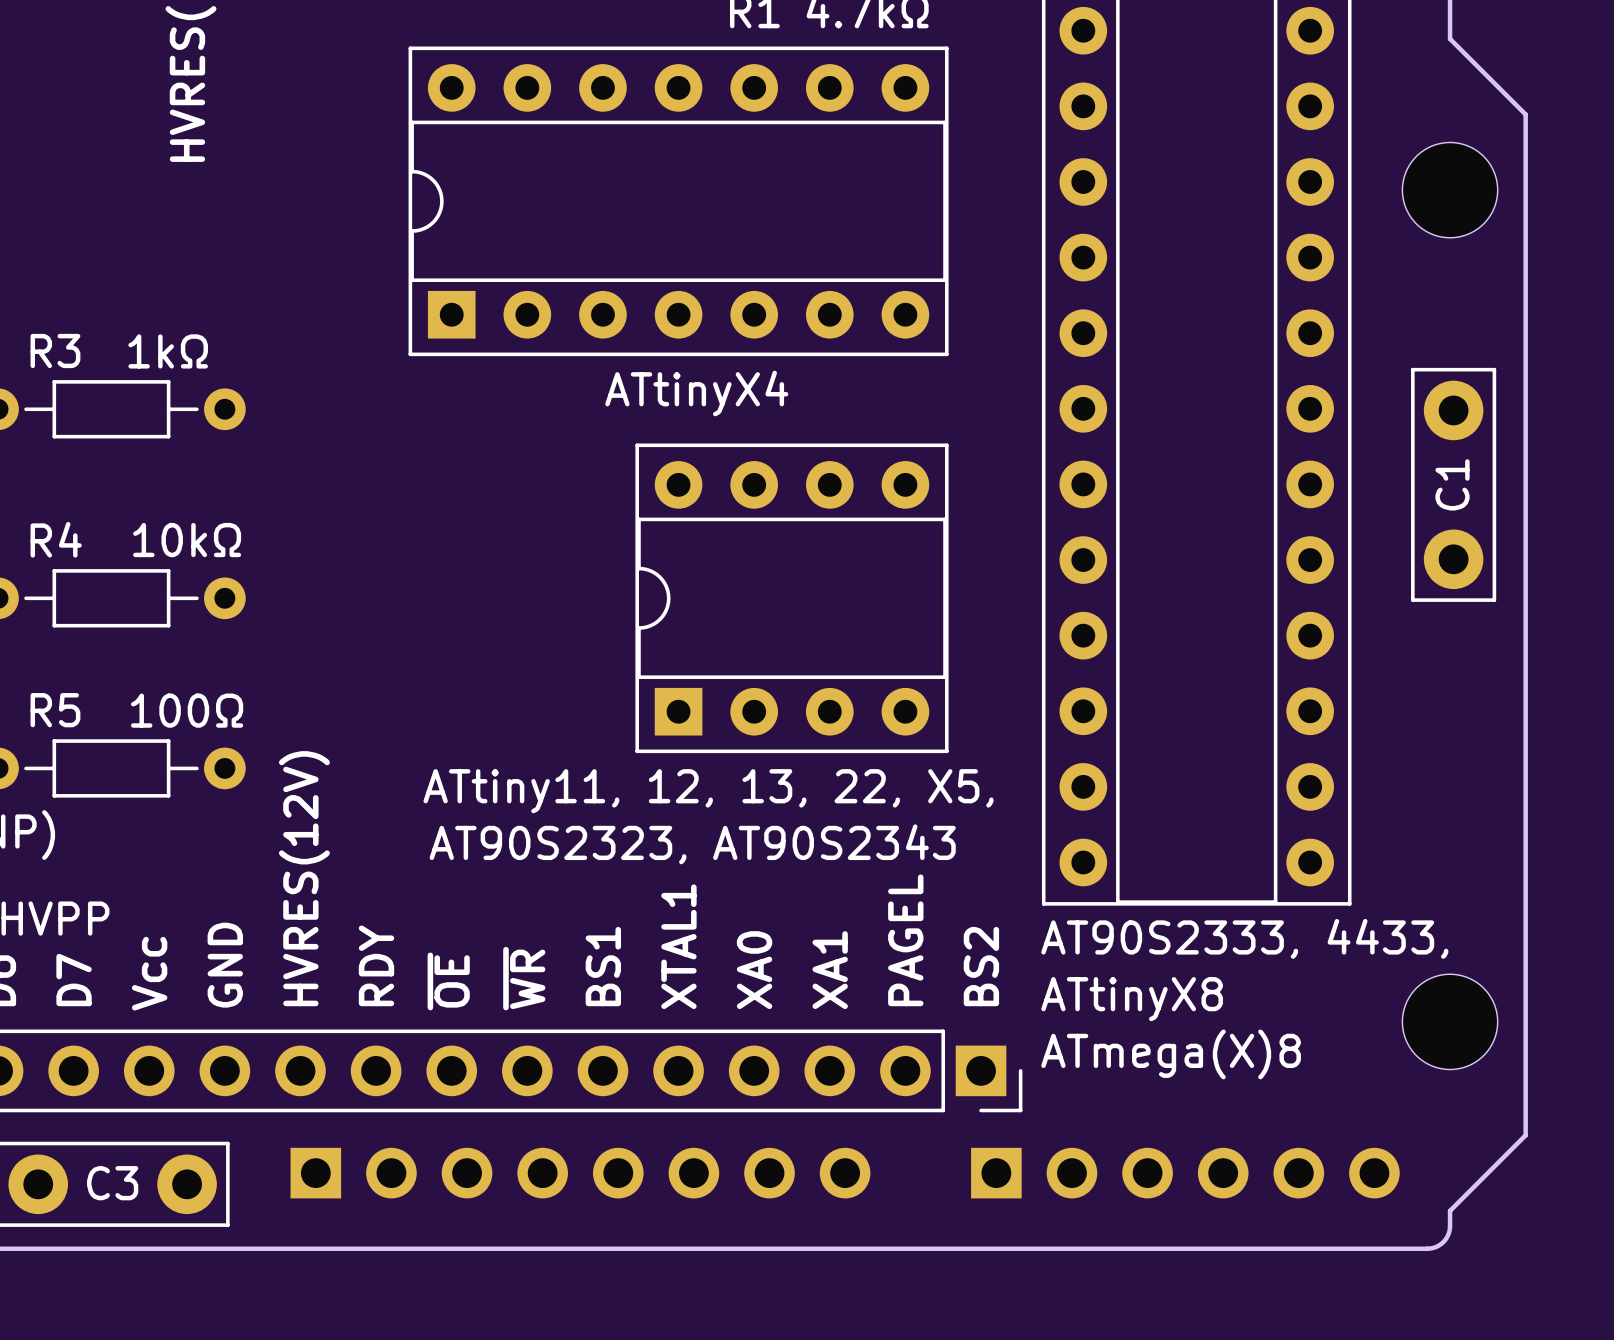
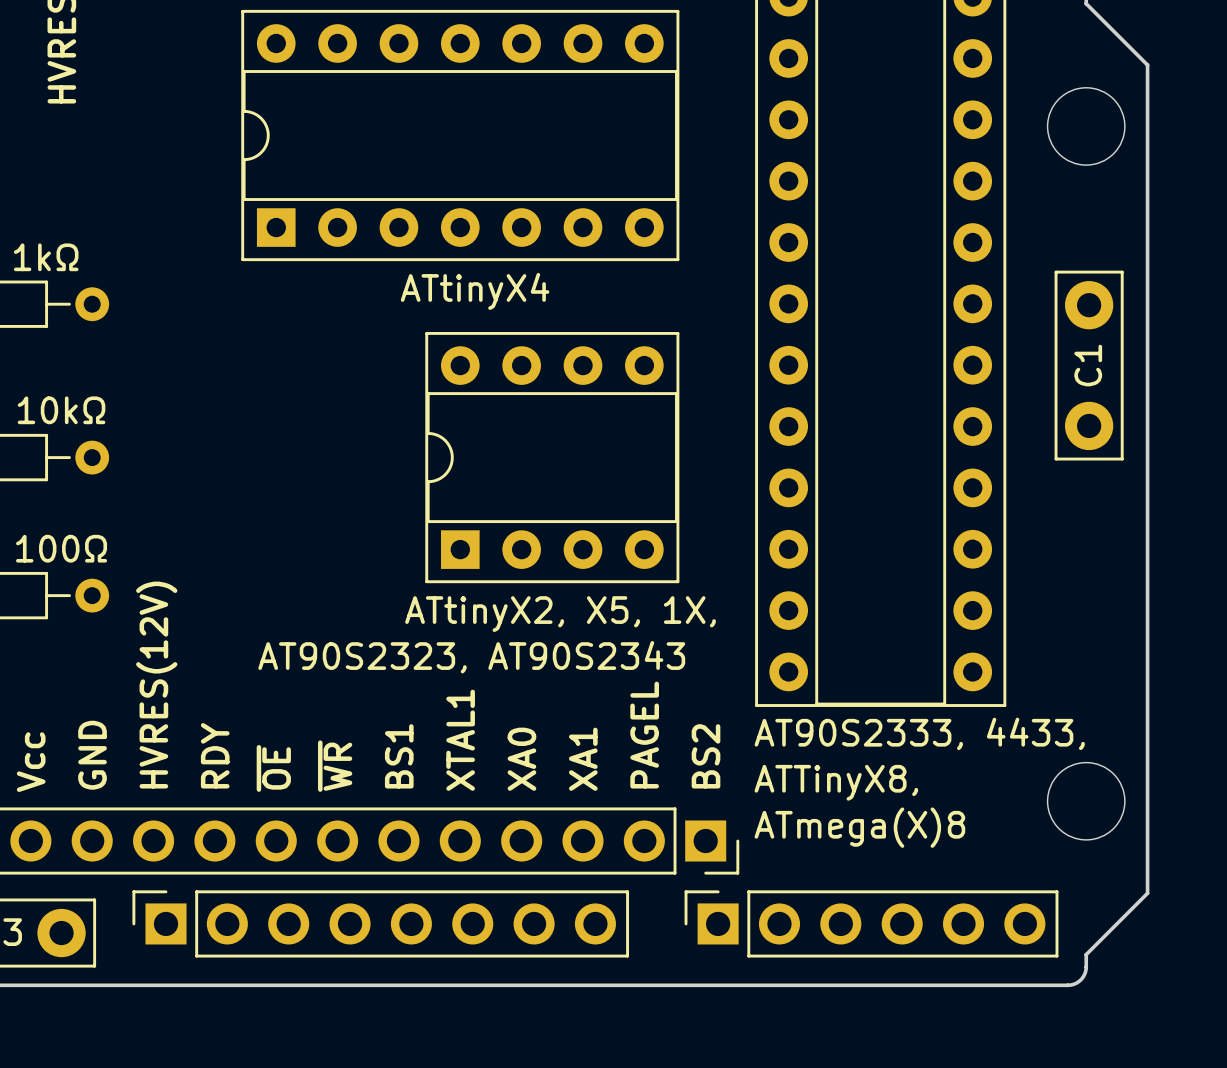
part value: ATtiny11, 12, 13, 22, X5, (708, 791) -> ATtinyX2, X5, 1X, (560, 614)
part value: ATtinyX8 (1132, 999) -> ATTinyX8, (836, 782)
part side: bottom (580, 1173) -> top (380, 923)
part side: bottom (1185, 1173) -> top (871, 923)

